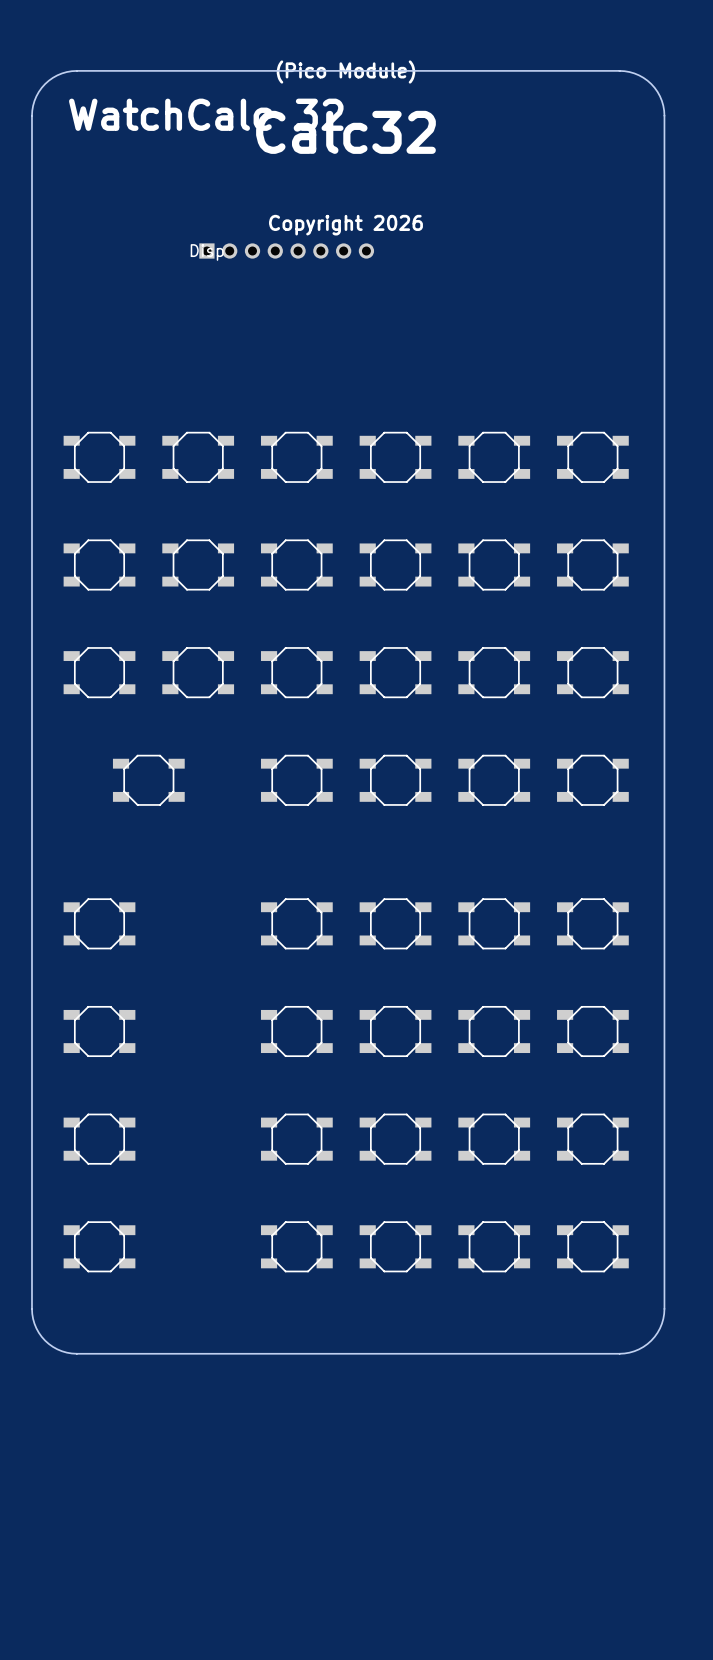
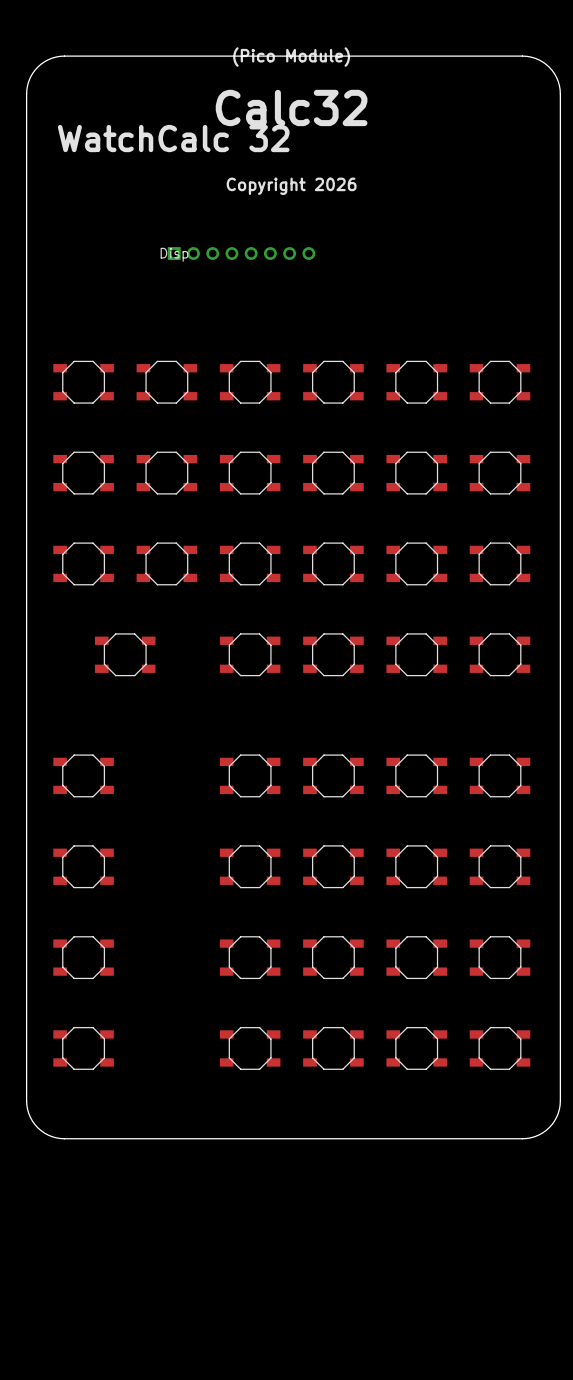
text position: WatchCalc 32 (206, 114) -> WatchCalc 32 (173, 138)
Disp position: (286, 251) -> (241, 253)

